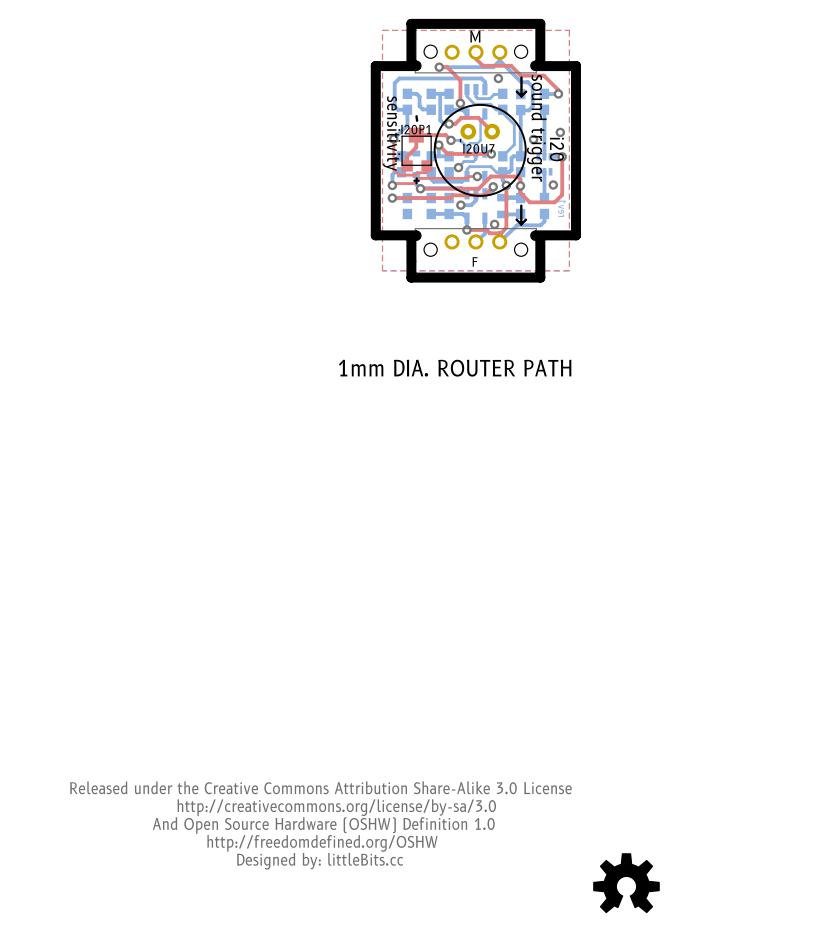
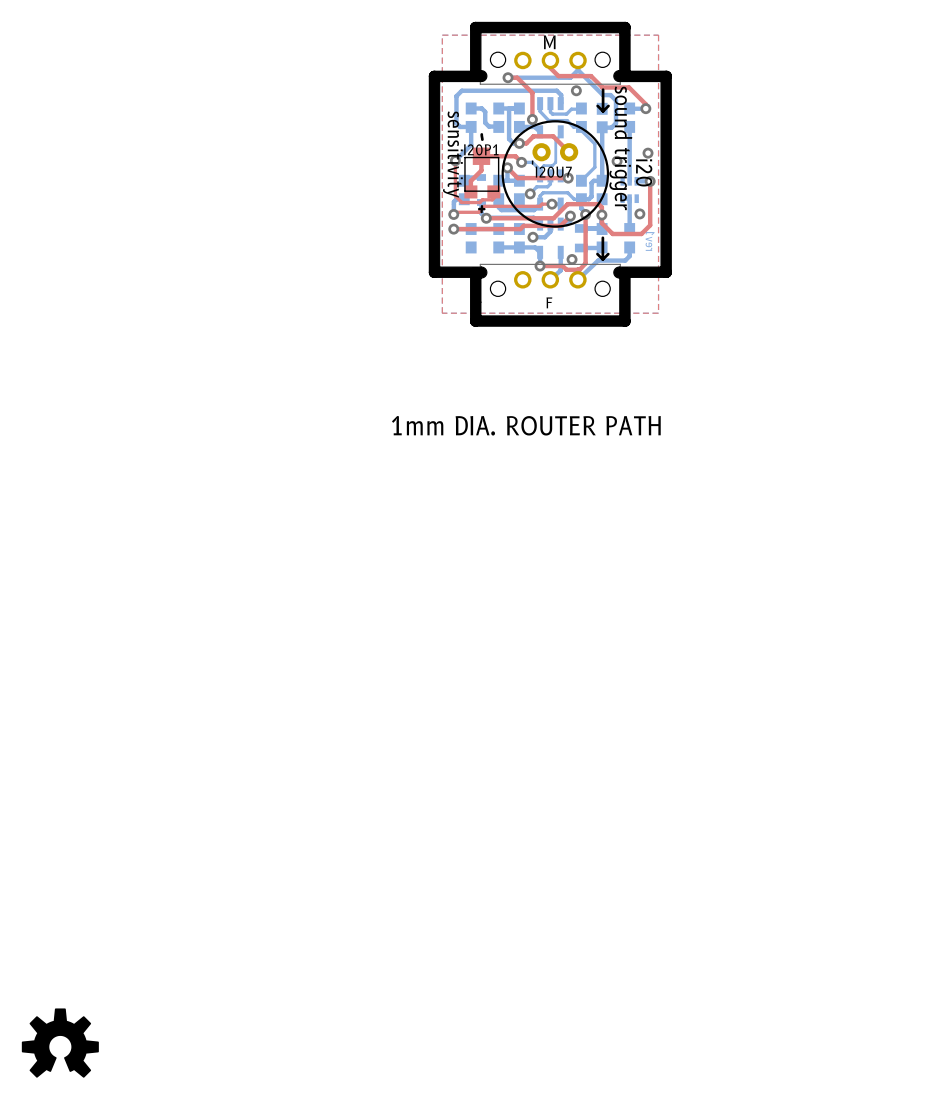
drawing: [593, 853, 660, 914] -> none
drawing: none -> [21, 1008, 99, 1078]

